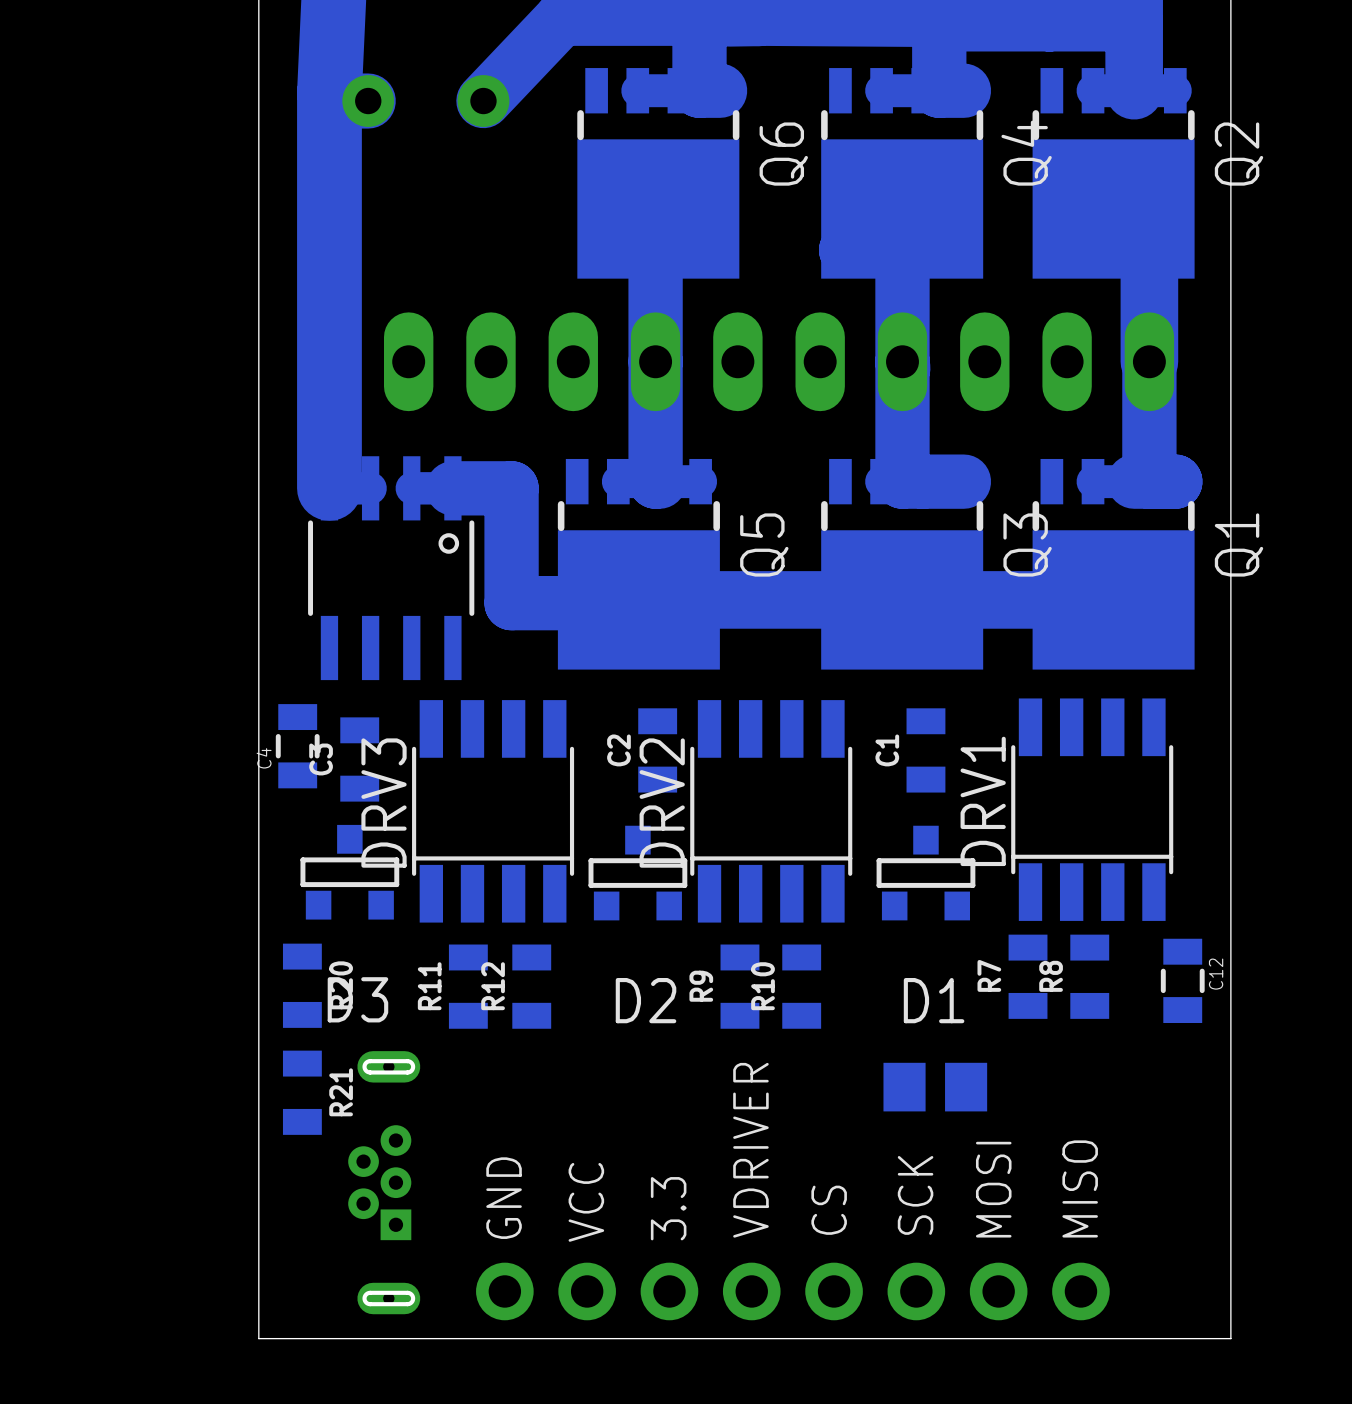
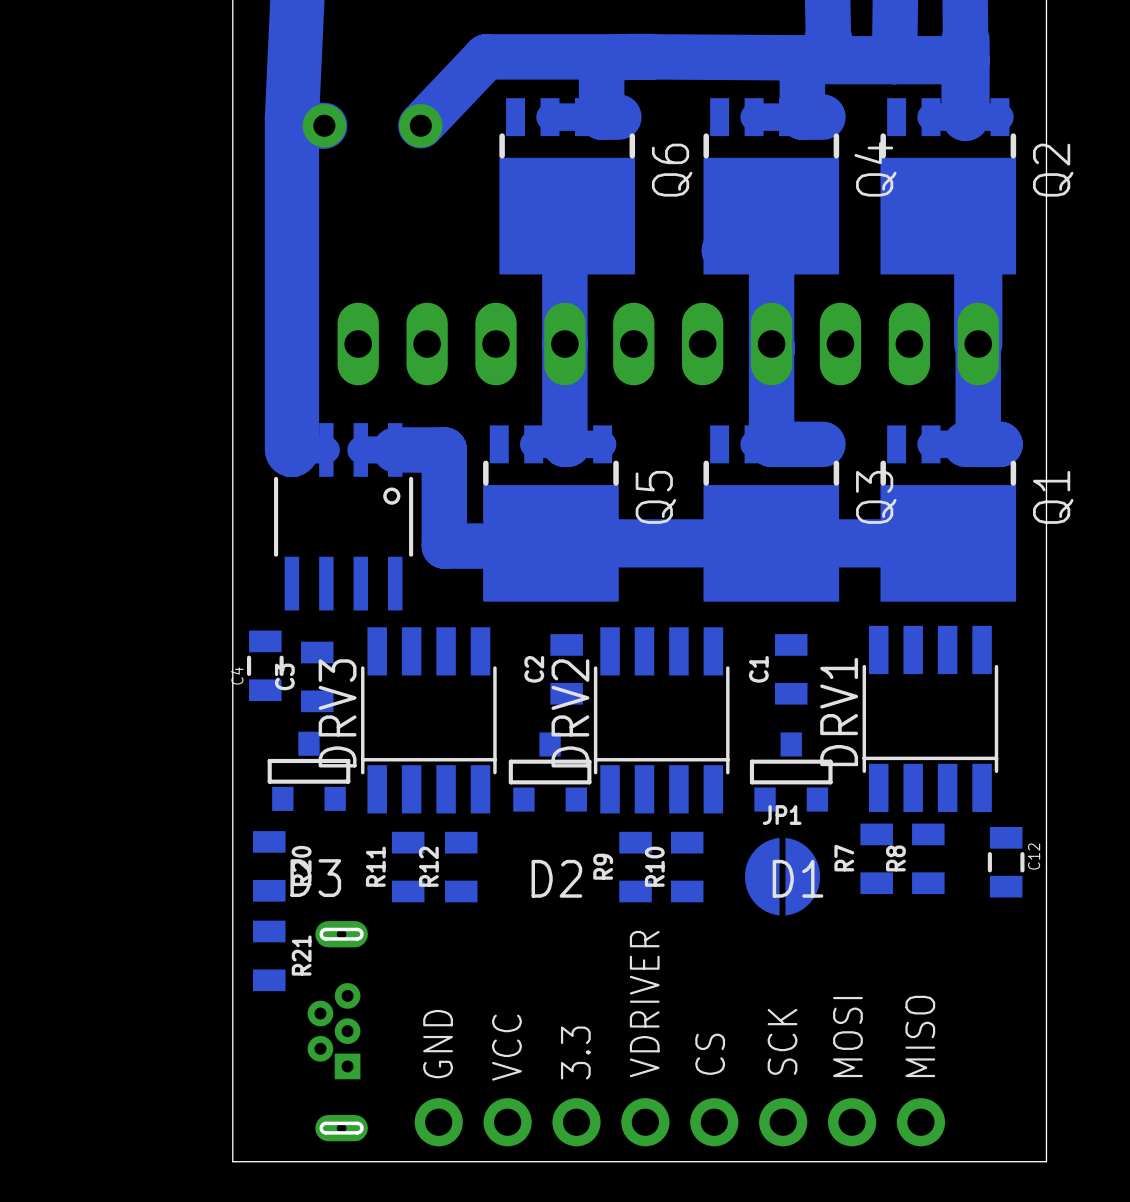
JP1: none -> (782, 876)
part: (935, 1087) -> none

